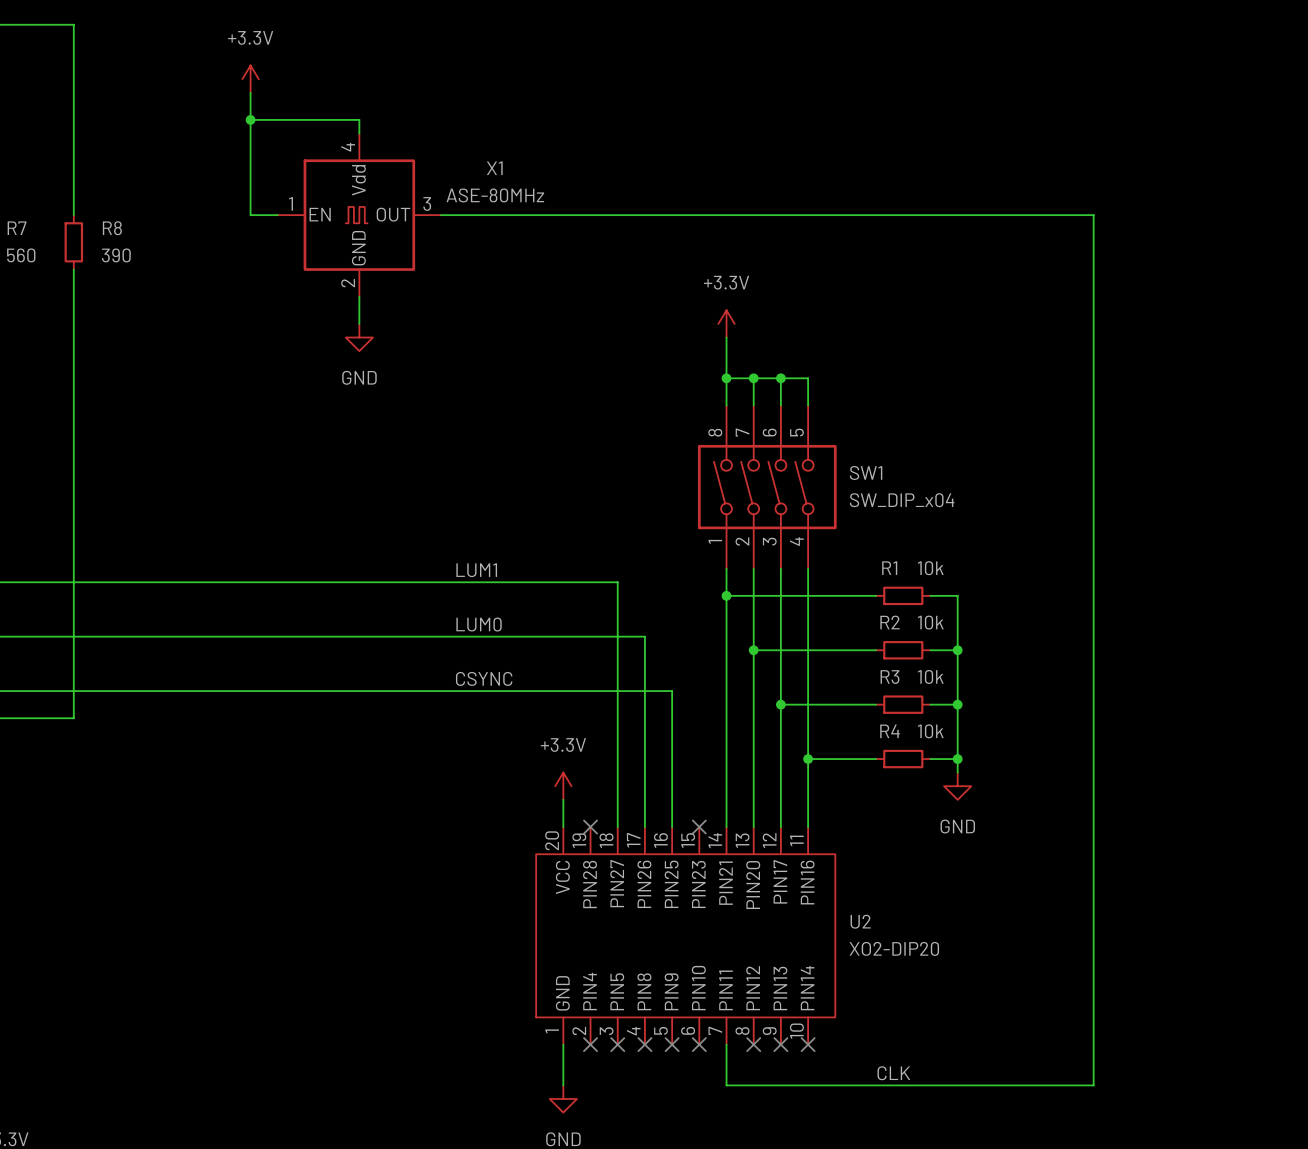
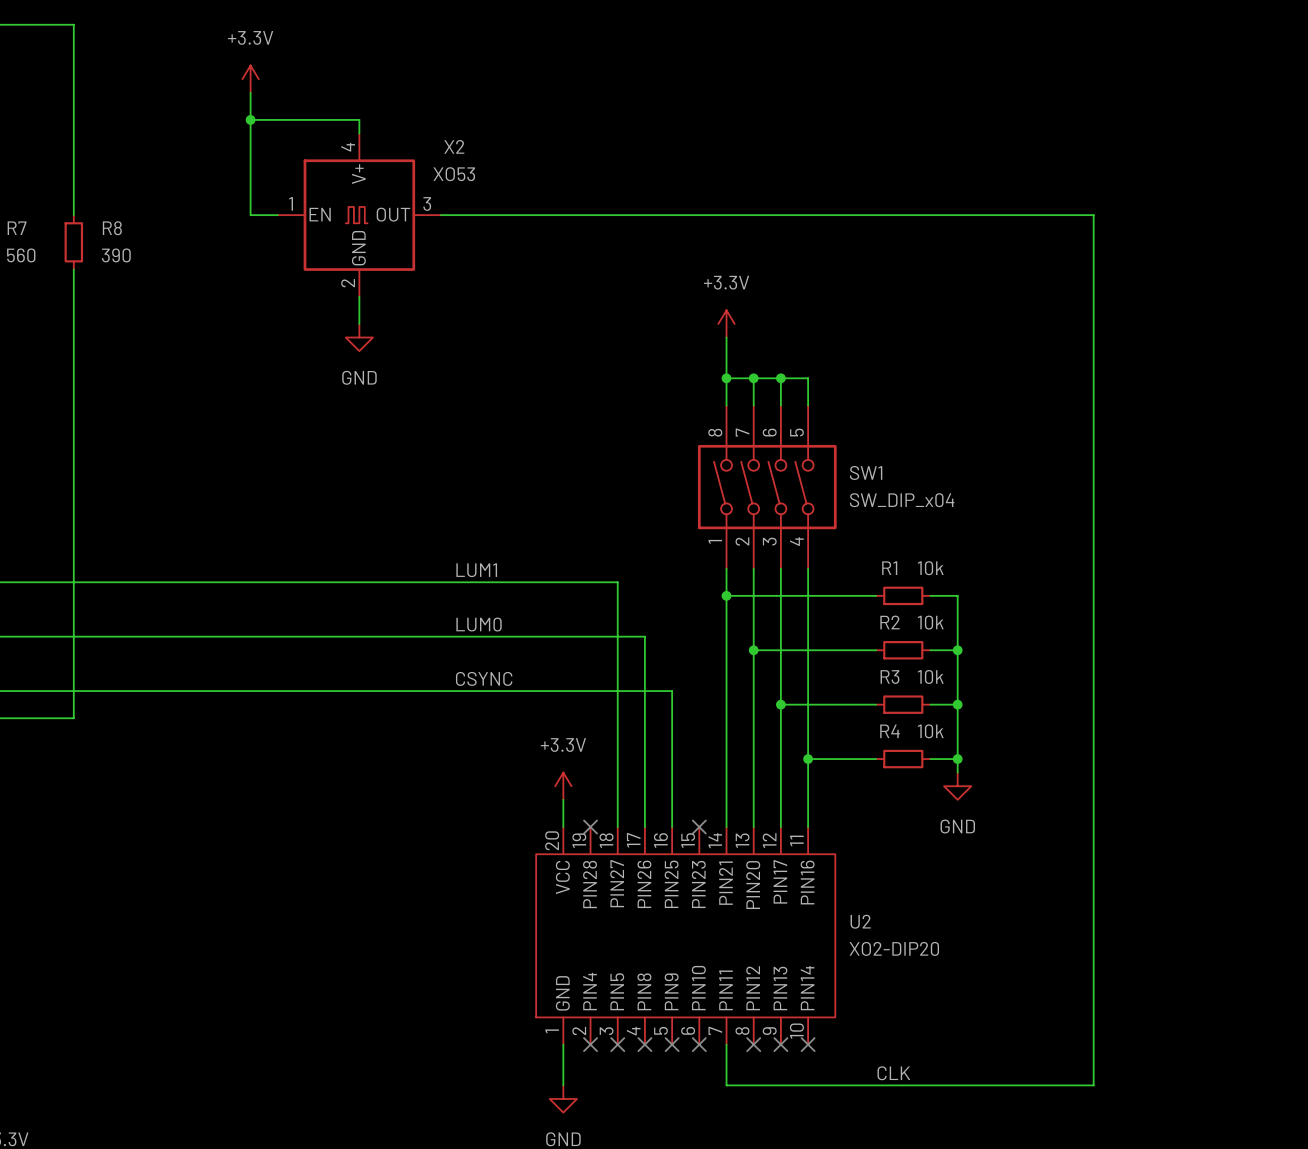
X1 name: X1 (494, 168) -> X2 (454, 146)
X1 pin name: Vdd (358, 180) -> V+ (358, 174)
X1 value: ASE-80MHz (495, 195) -> XO53 (454, 174)

